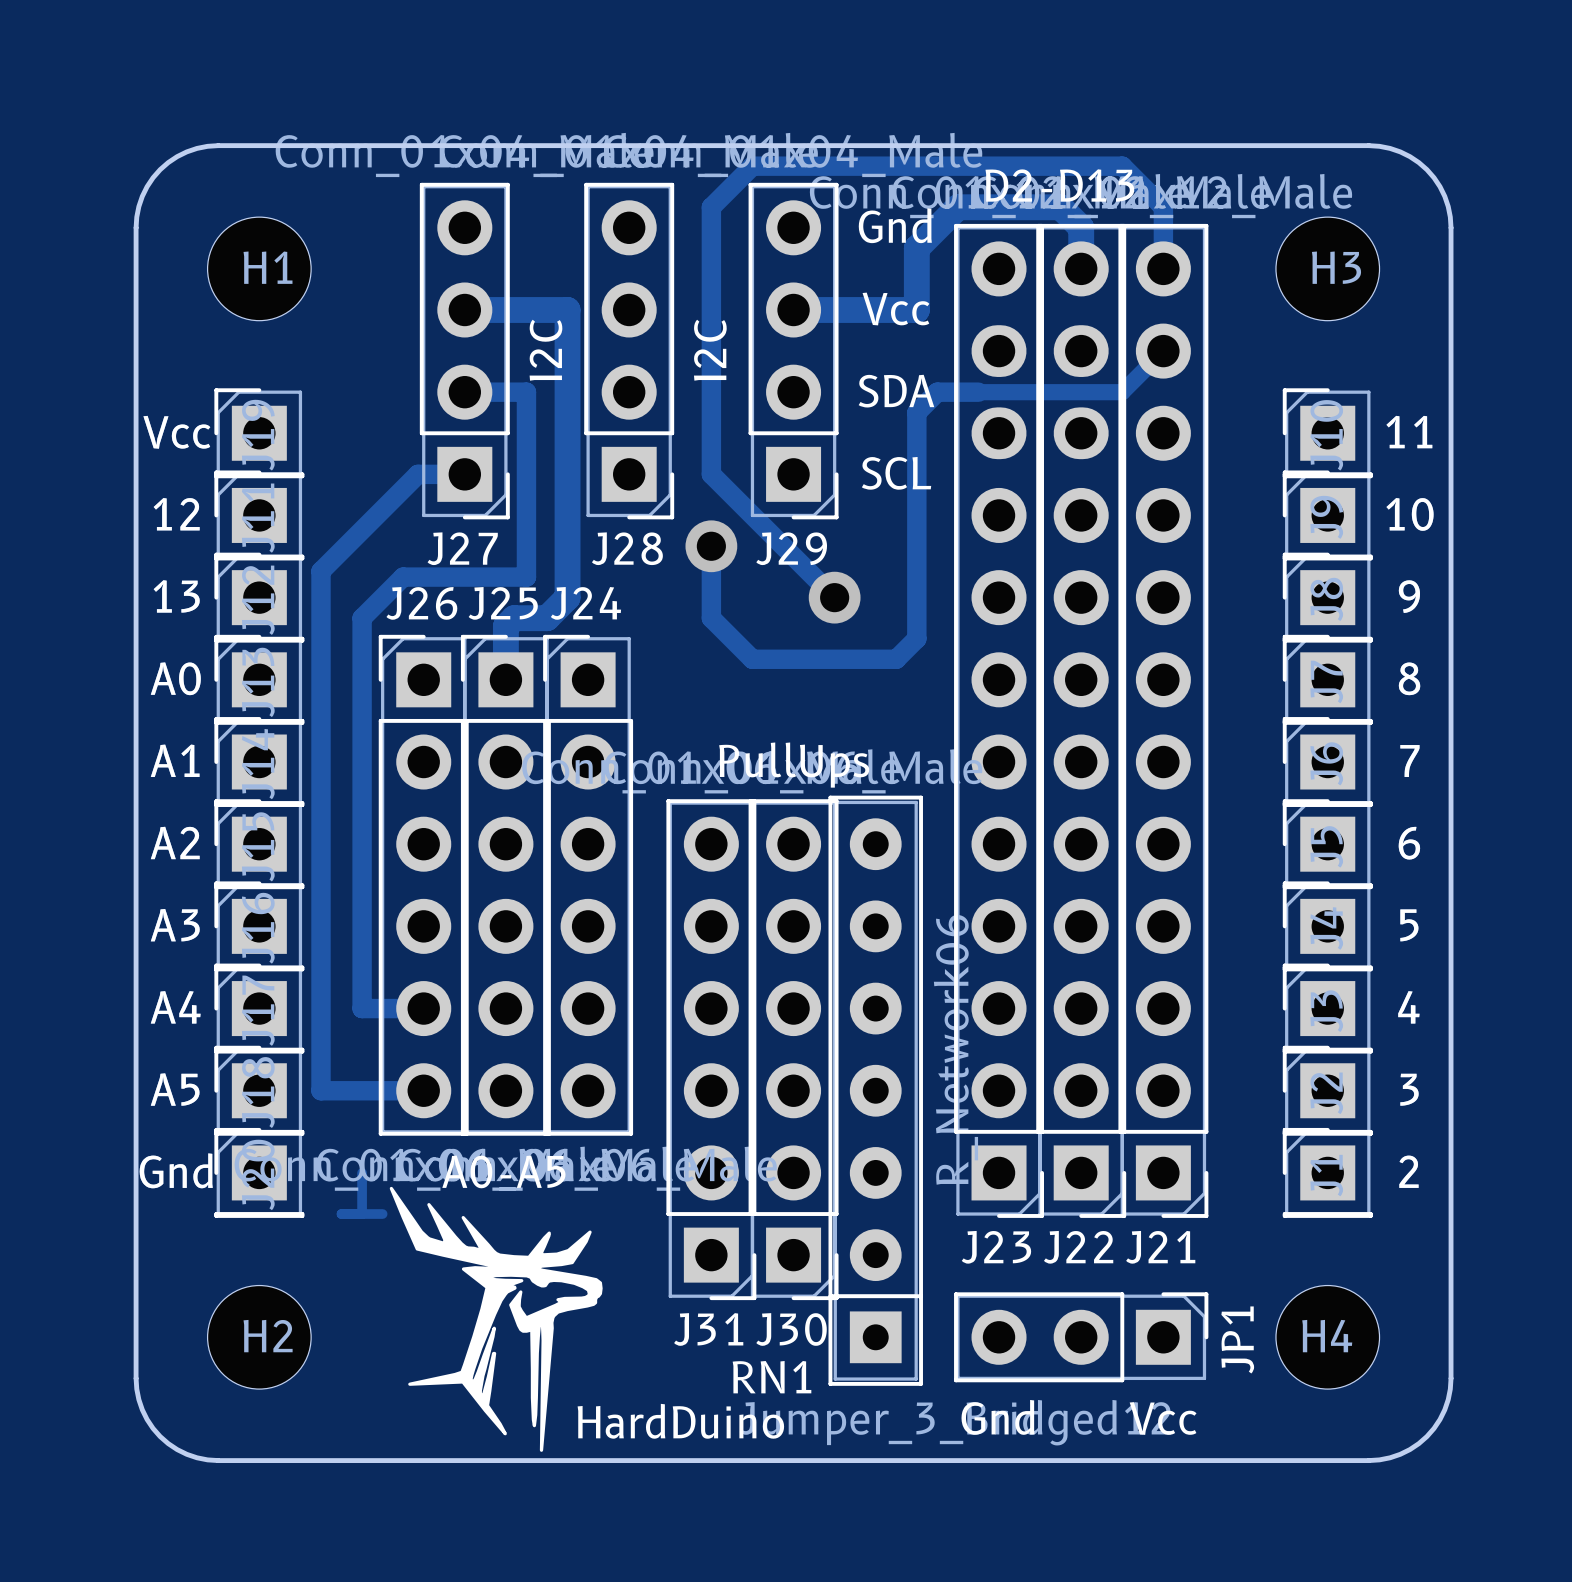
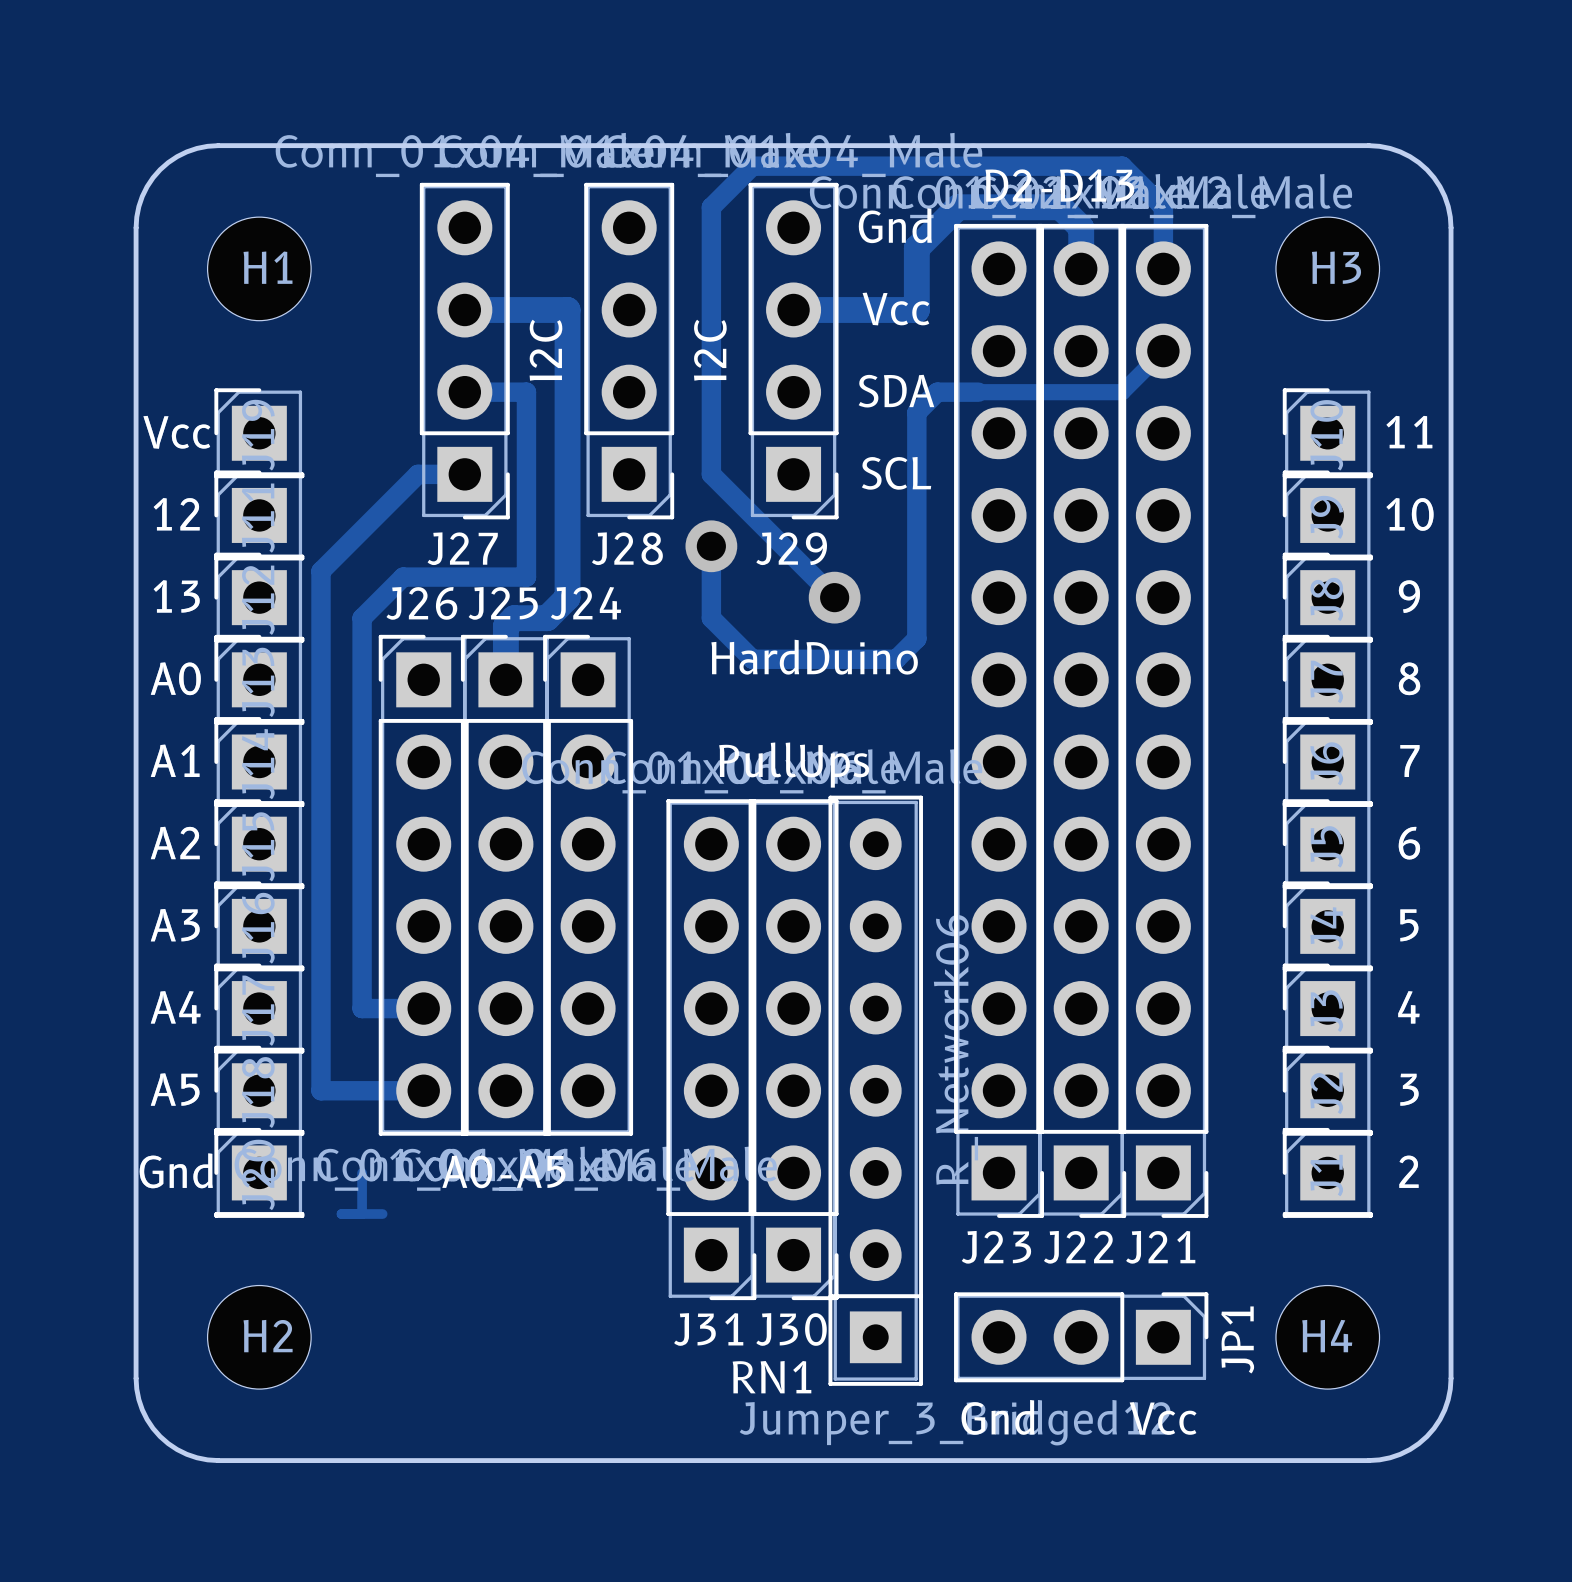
drawing: [389, 1186, 603, 1452] -> none
text position: HardDuino (680, 1421) -> HardDuino (814, 657)

